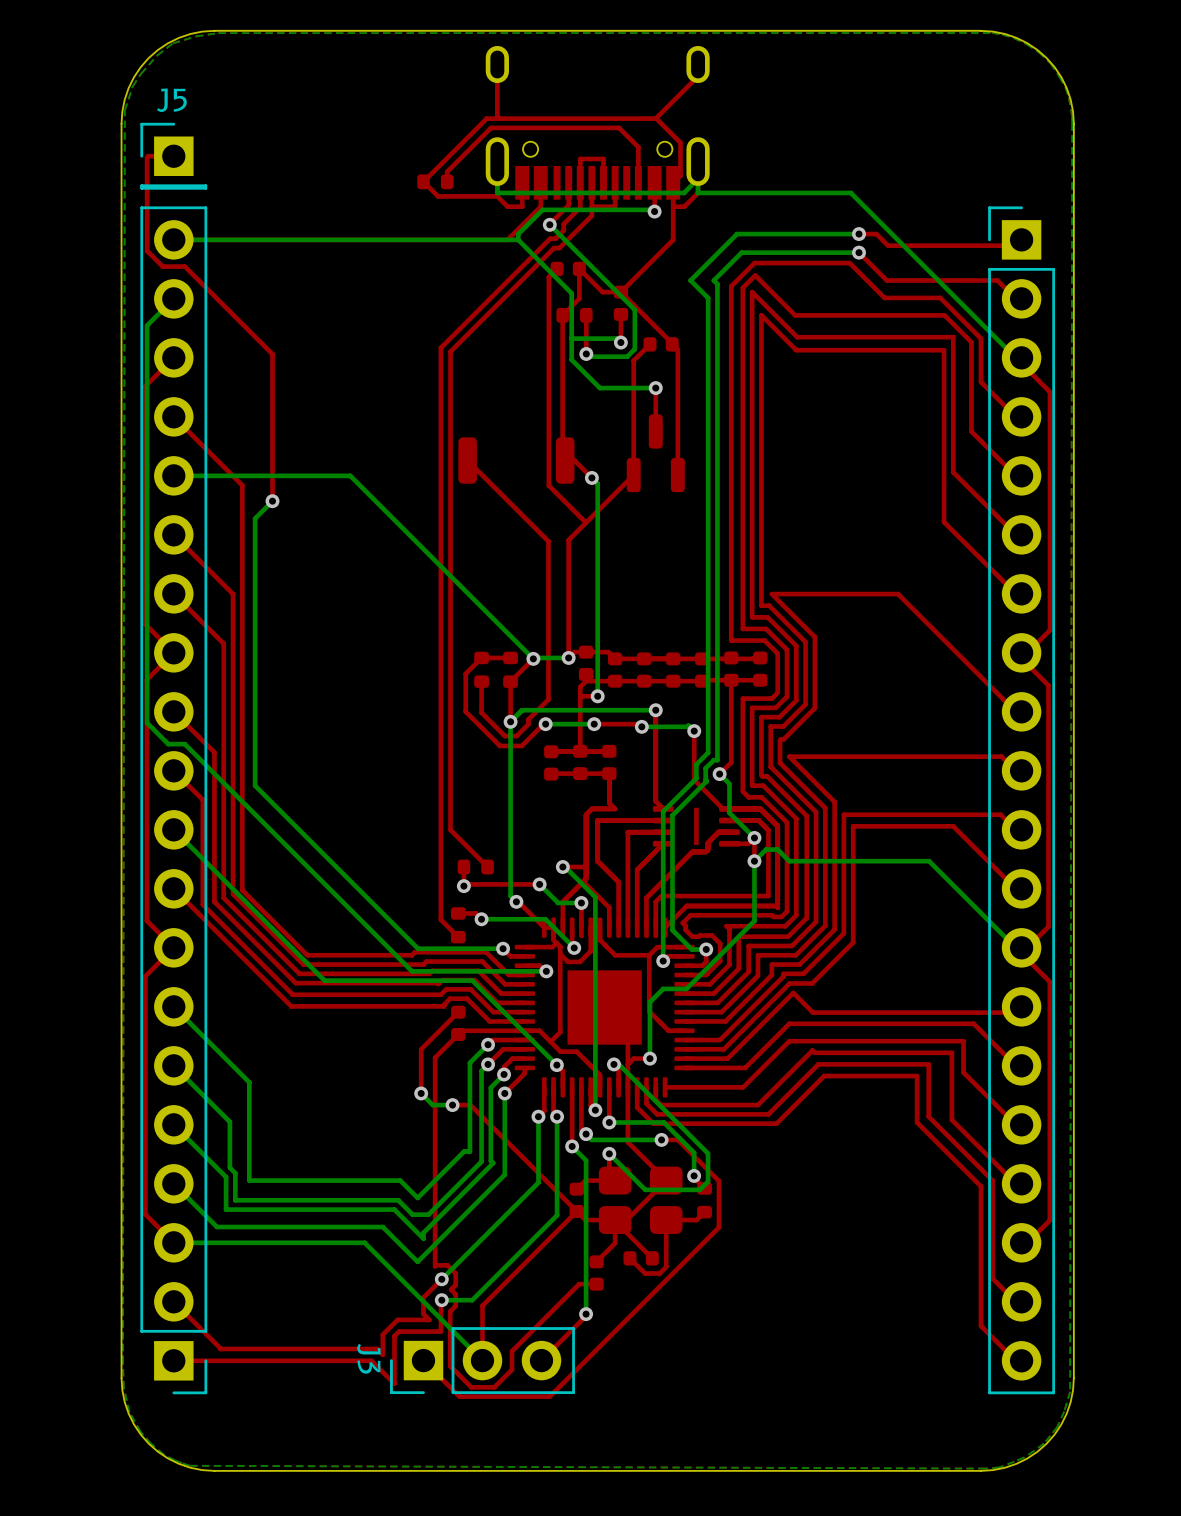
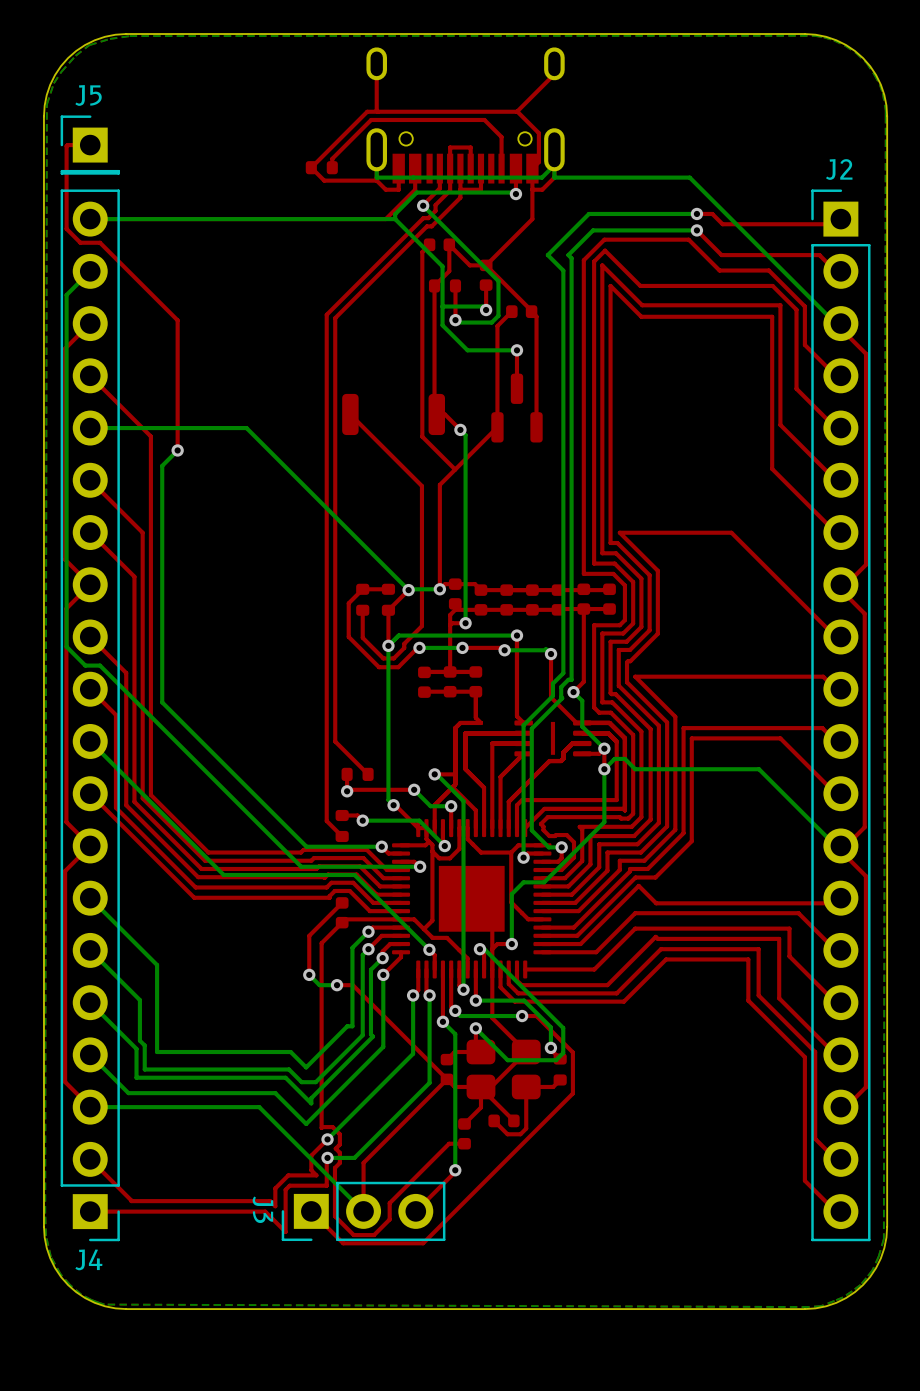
J2 name: none -> J2 (839, 169)
J4 name: none -> J4 (88, 1259)

